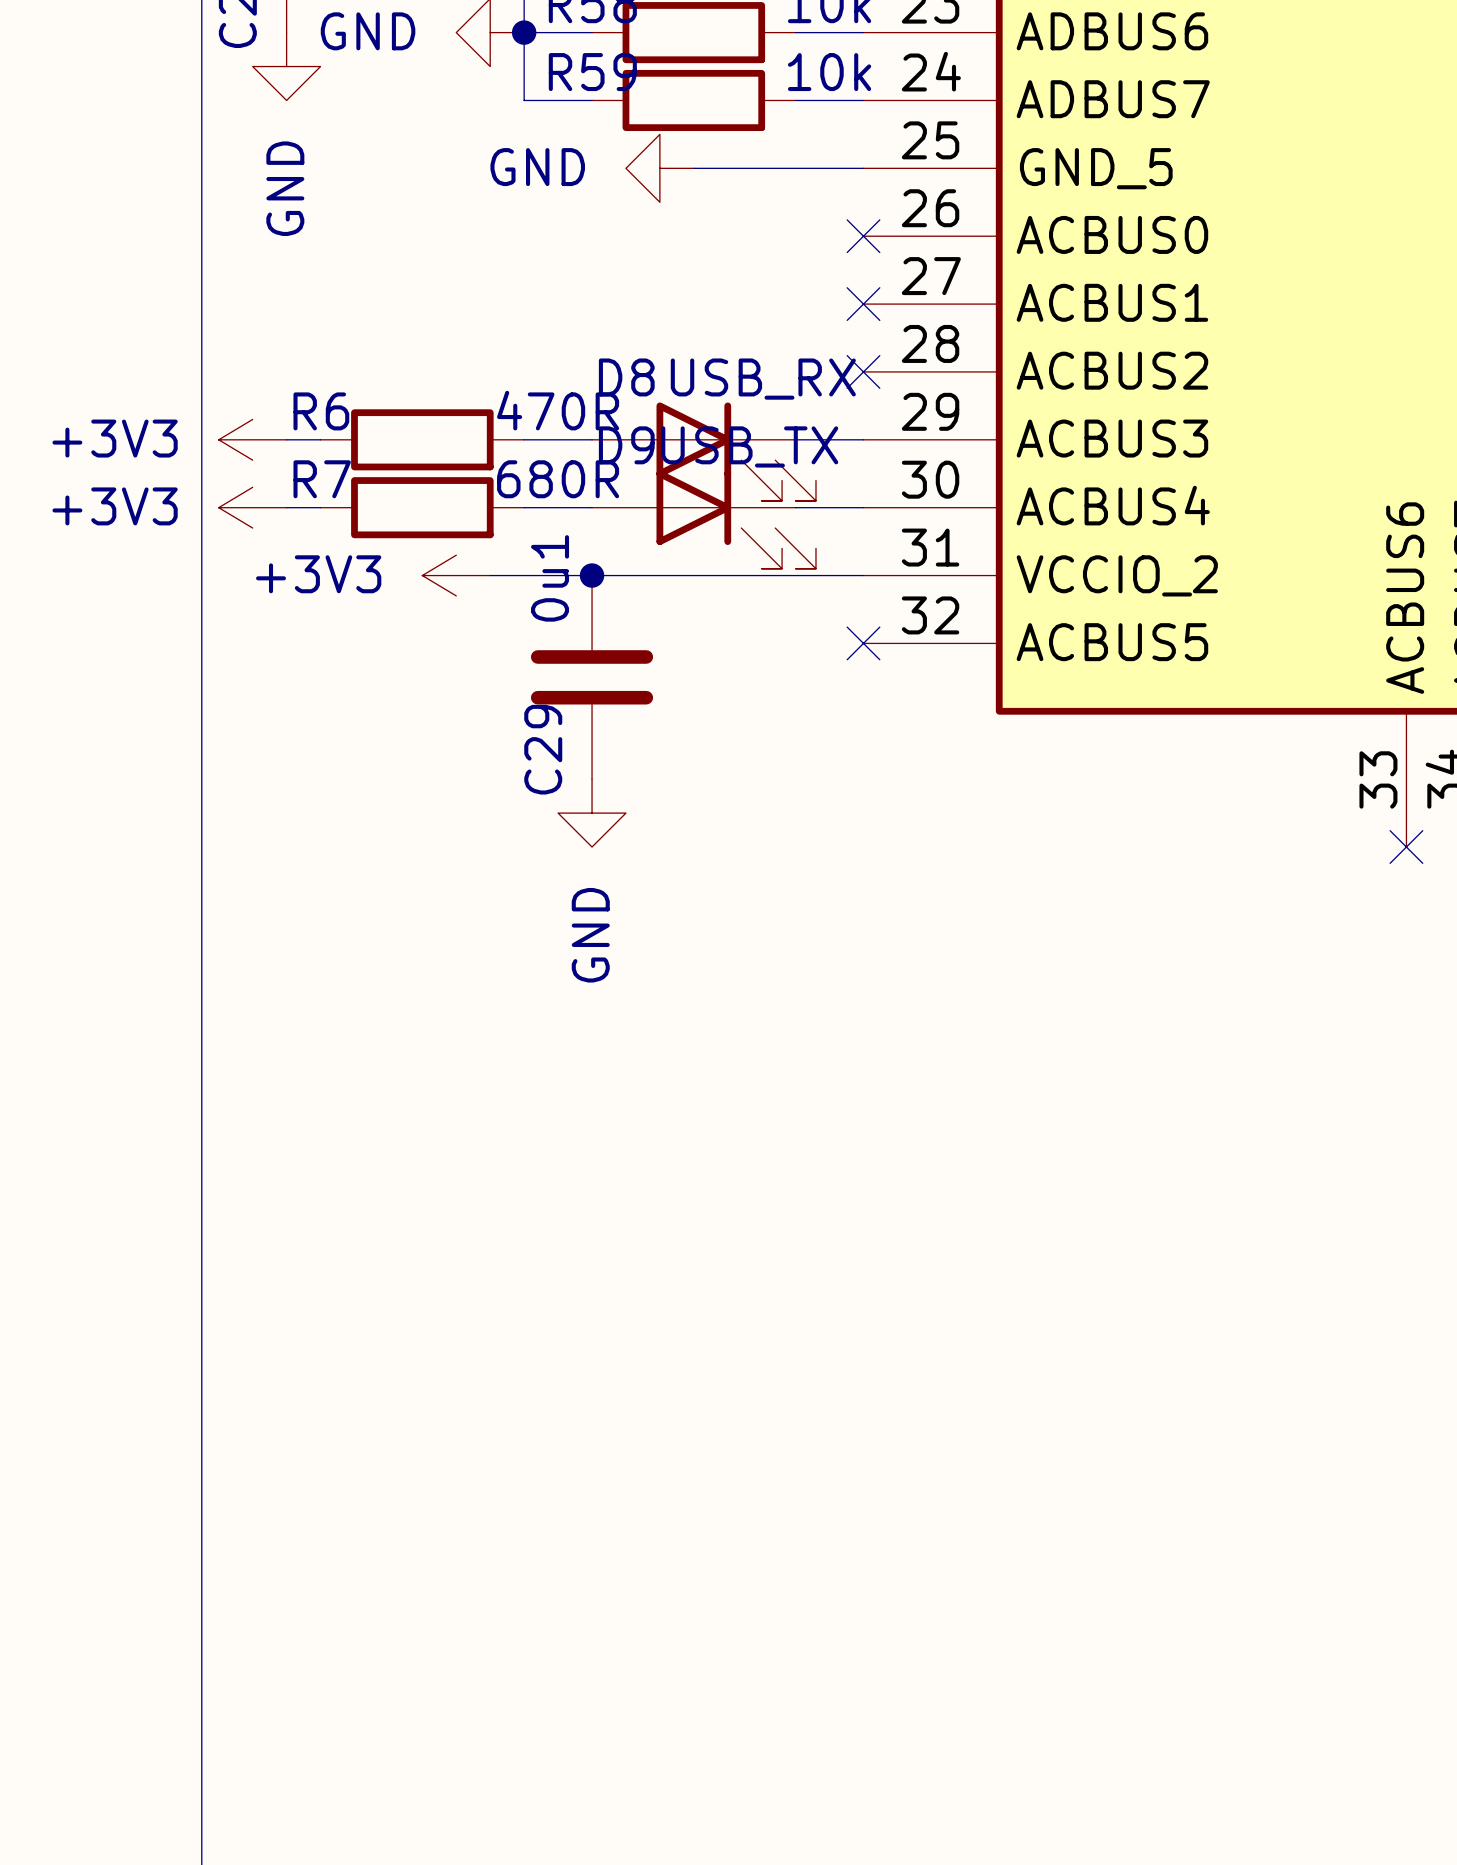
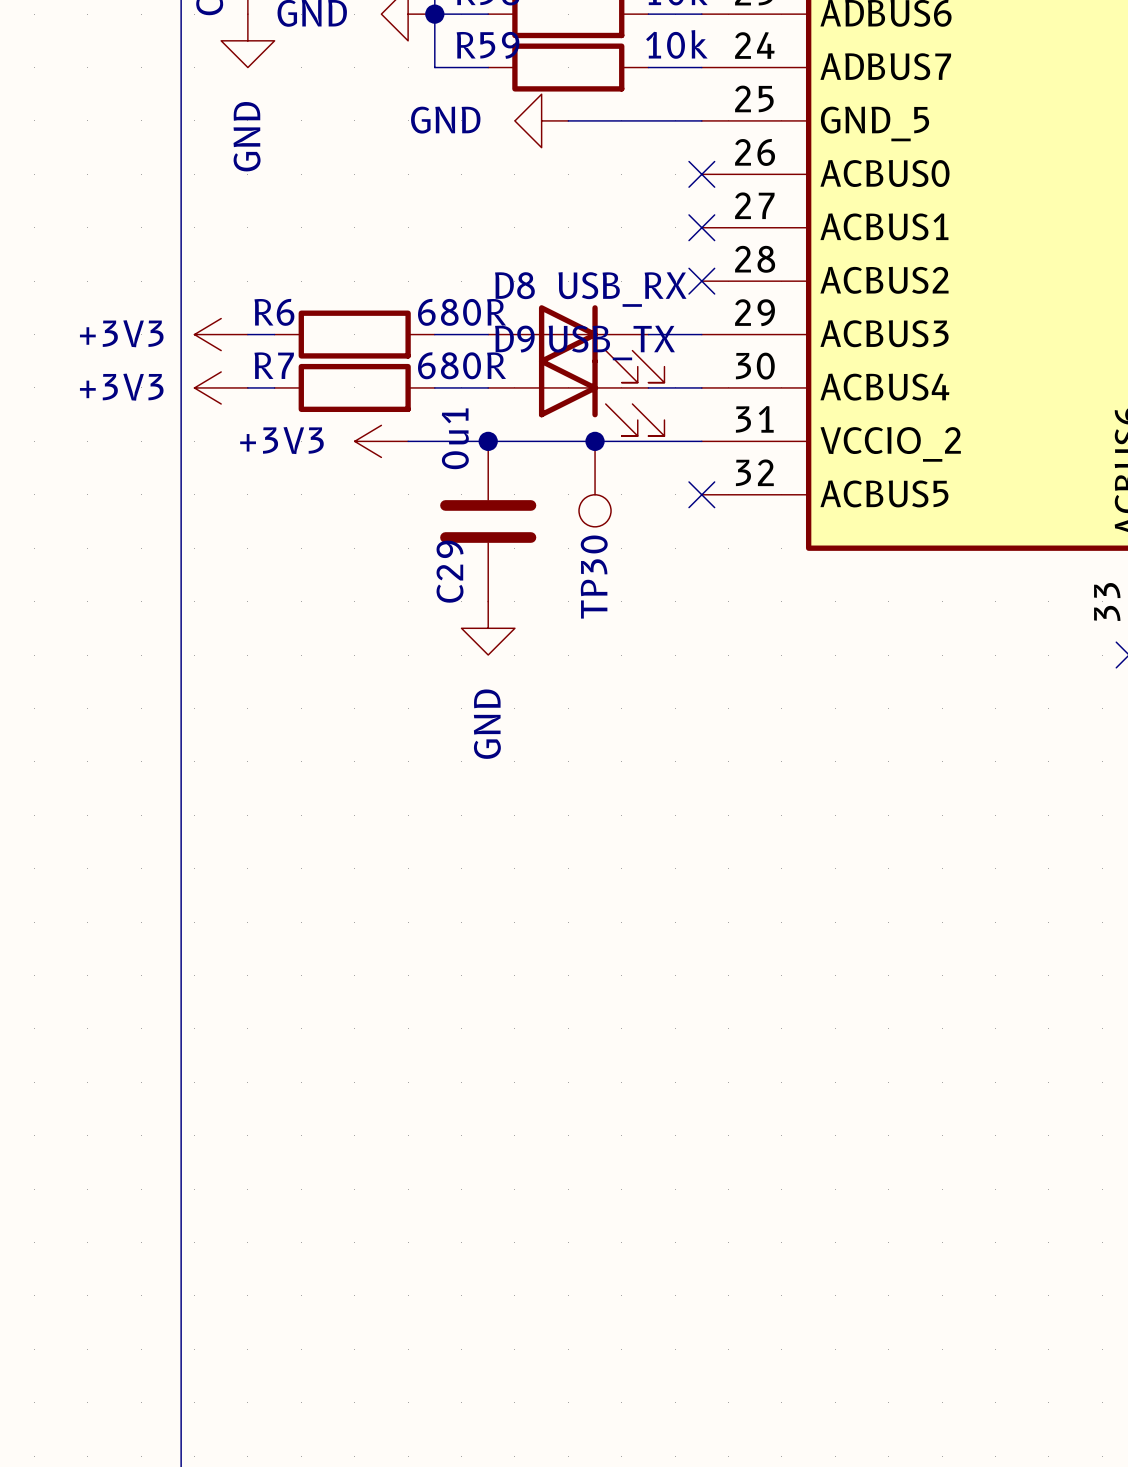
R6 value: 470R (558, 410) -> 680R (462, 312)
junction: none -> (595, 441)
TP30: none -> (595, 484)

